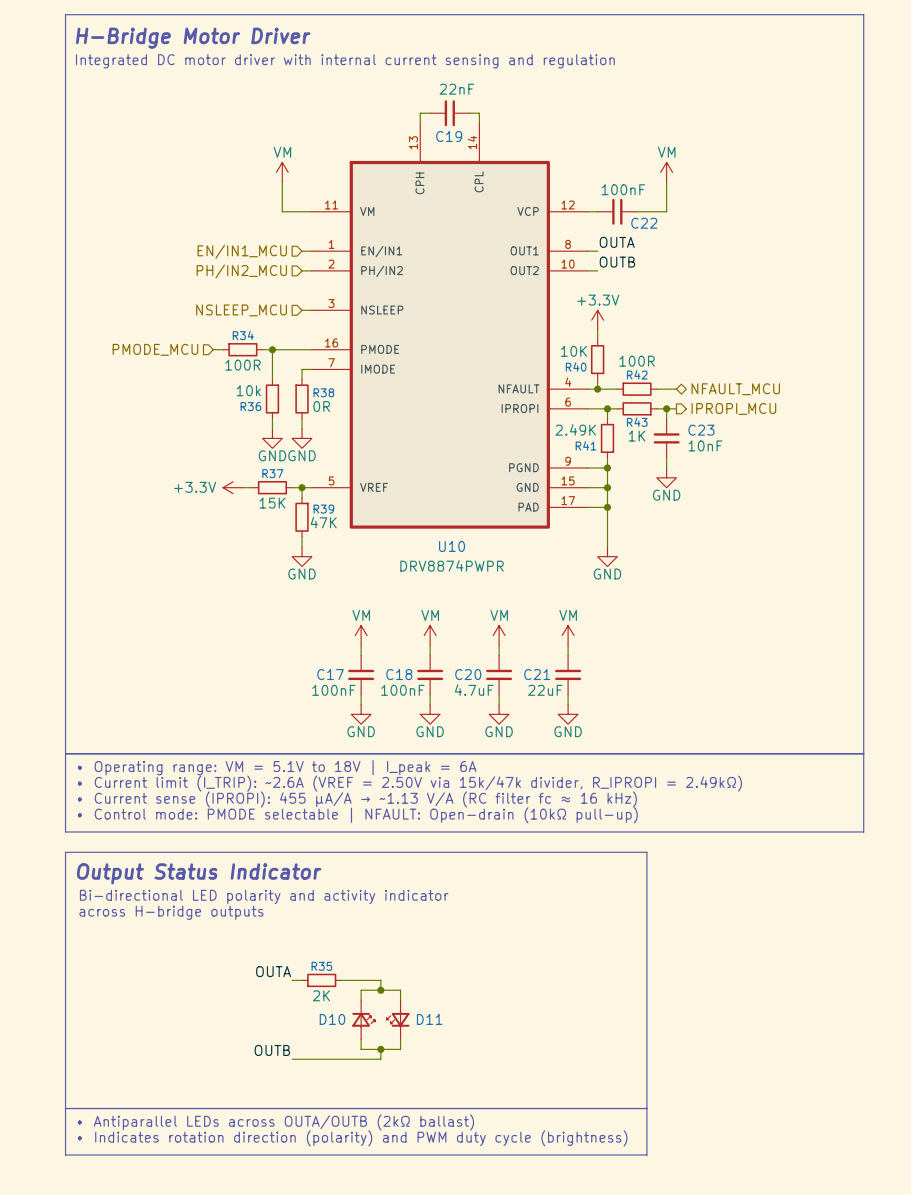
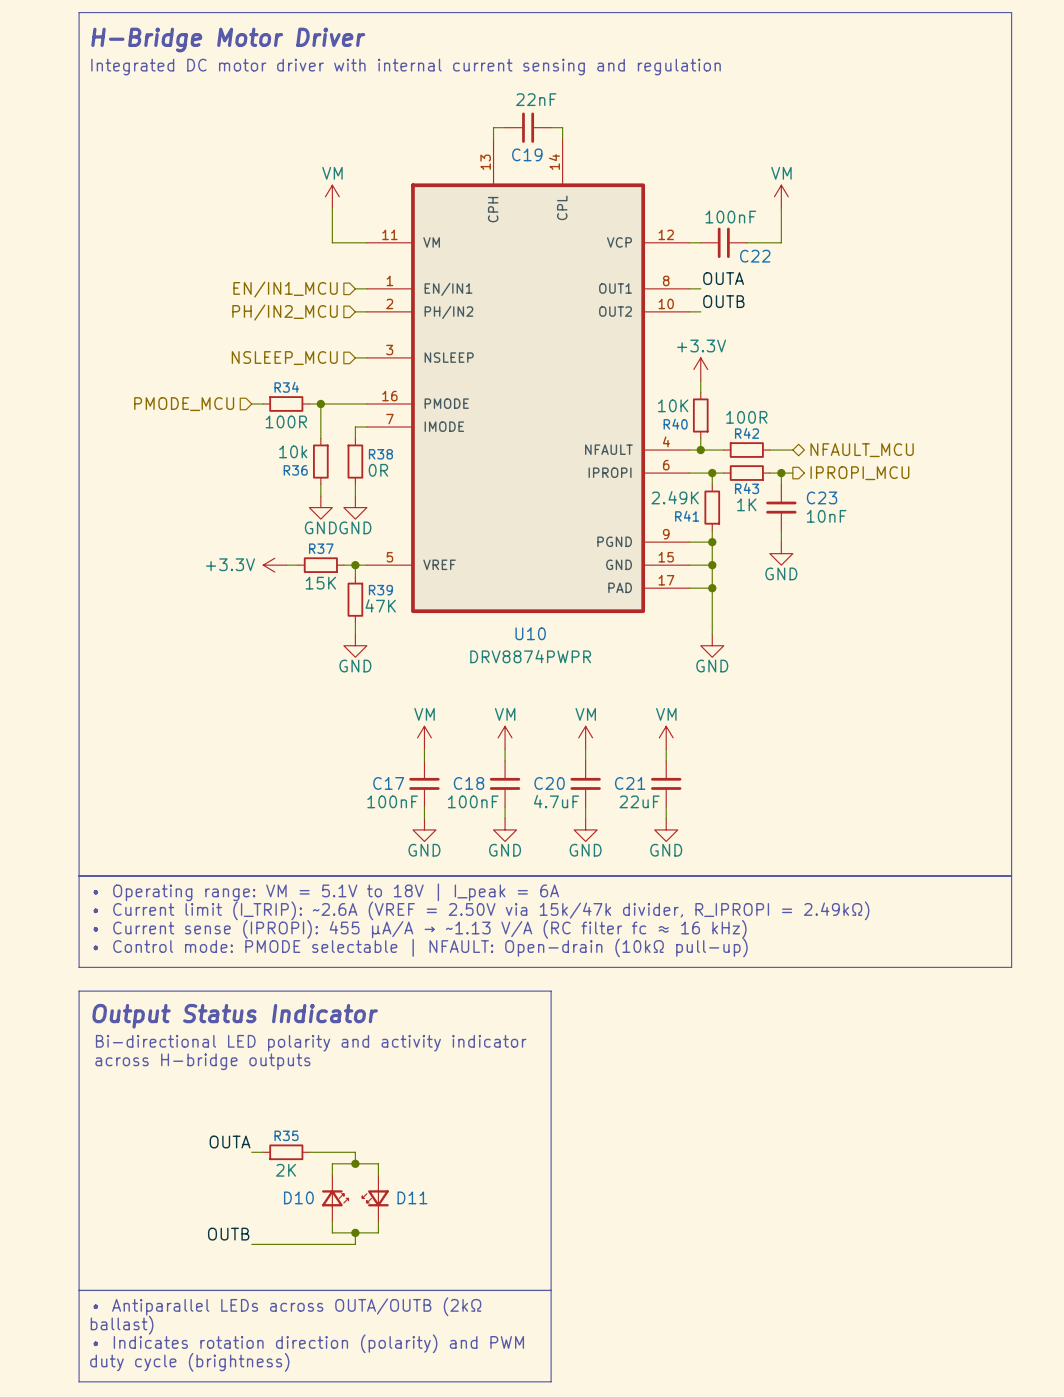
line: (469, 852) (646, 852) (646, 1108) -> none
label position: OUTA (273, 971) -> OUTA (230, 1142)
wire: (292, 980) (302, 980) -> (251, 1152) (263, 1152)
R35 position: (321, 980) -> (286, 1152)
wire: (341, 980) (380, 980) (380, 990) -> (309, 1152) (355, 1152) (355, 1163)
junction: (380, 990) -> none
junction: none -> (355, 1163)
wire: (361, 1000) (361, 990) (400, 990) (400, 1000) -> (332, 1175) (332, 1163) (378, 1163) (378, 1175)
D10 position: (363, 1019) -> (335, 1198)
D11 position: (398, 1019) -> (375, 1198)
wire: (361, 1039) (361, 1049) (400, 1049) (400, 1039) -> none
wire: none -> (332, 1221) (332, 1232) (343, 1232)
wire: (380, 1049) (380, 1059) (321, 1059) -> (378, 1221) (378, 1232)
junction: (380, 1049) -> none
label position: OUTB (272, 1050) -> OUTB (228, 1234)
wire: none -> (355, 1232) (355, 1244) (251, 1244)
junction: none -> (355, 1232)
line: (646, 1108) (646, 1155) (65, 1155) -> (551, 991) (551, 1381) (79, 1381) (79, 1344)
line: (646, 1108) (469, 1108) (646, 1108) -> none
text: • Antiparallel LEDs across OUTA/OUTB (2kΩ ballast) (275, 1122) -> • Antiparallel LEDs across OUTA/OUTB (2kΩ (287, 1306)
text: • Indicates rotation direction (polarity) and PWM duty cycle (brightness) (352, 1138) -> ballast) (122, 1325)
text: none -> • Indicates rotation direction (polarity) and PWM (308, 1343)
text: none -> duty cycle (brightness) (189, 1362)

